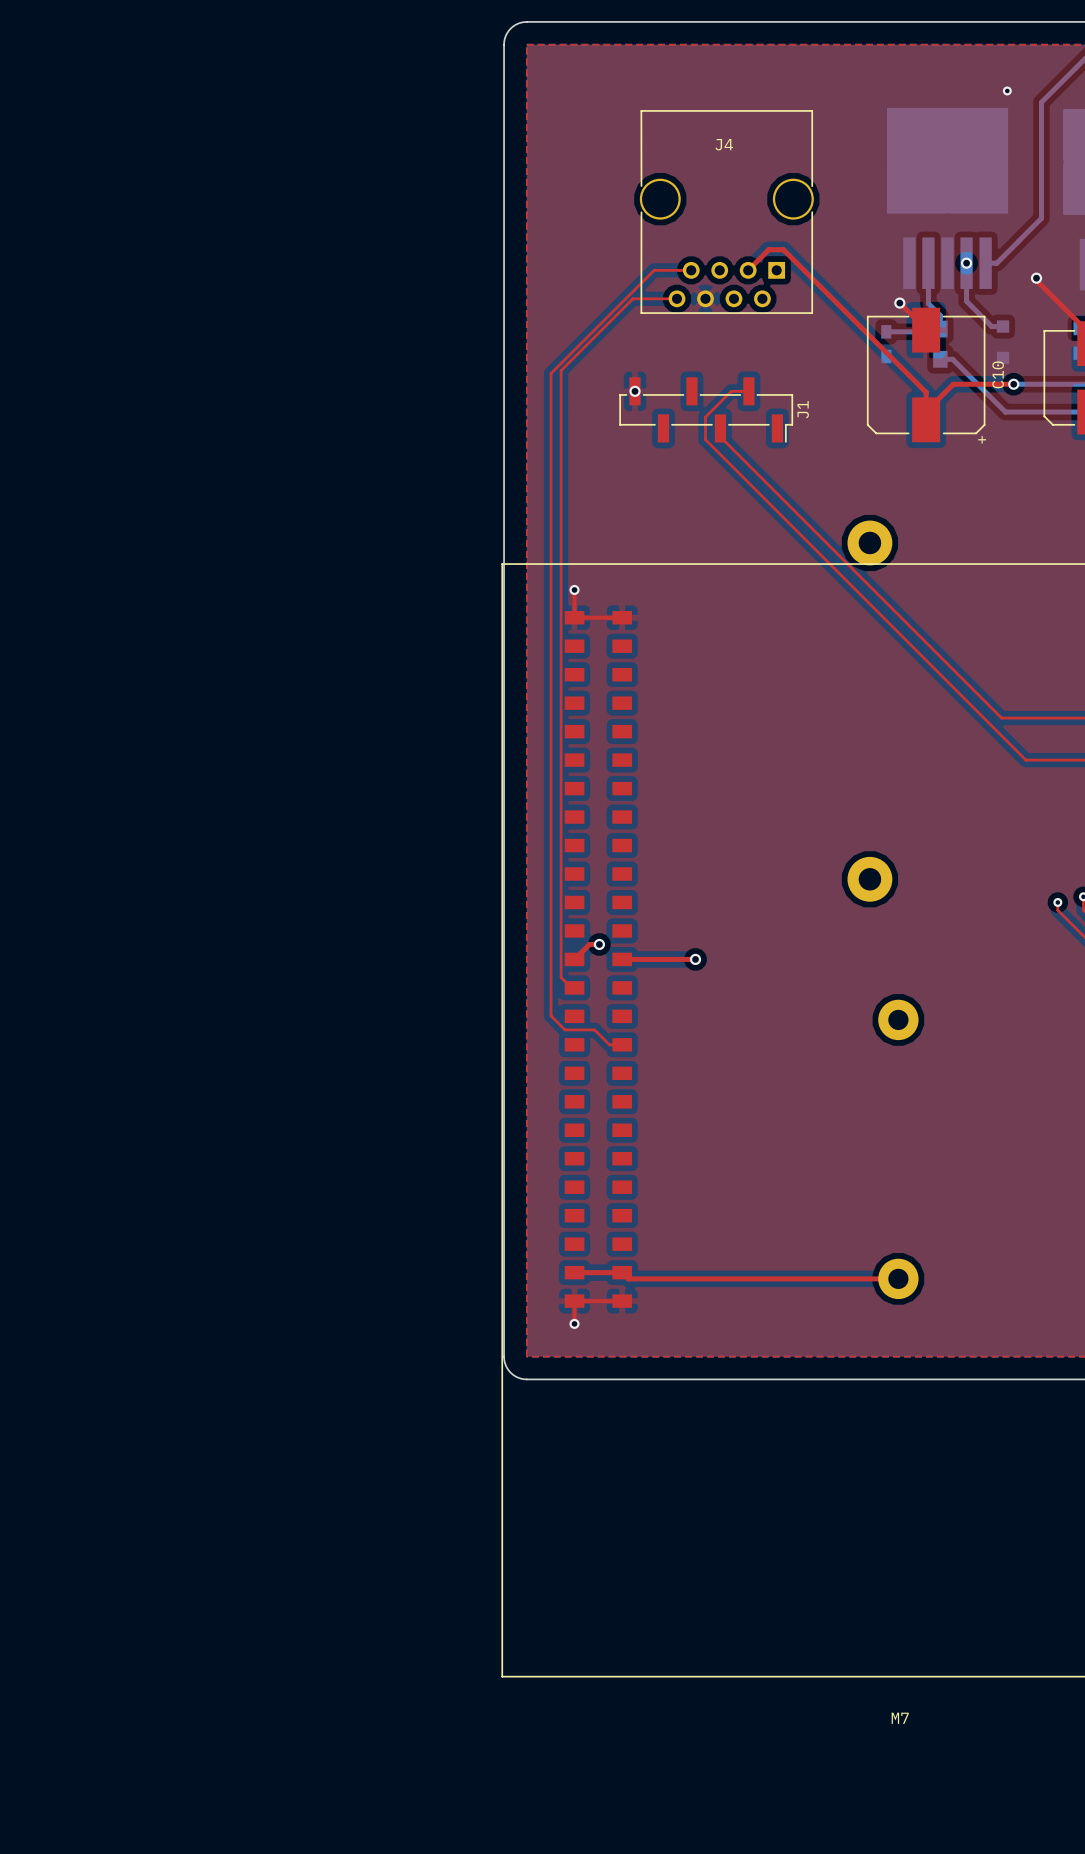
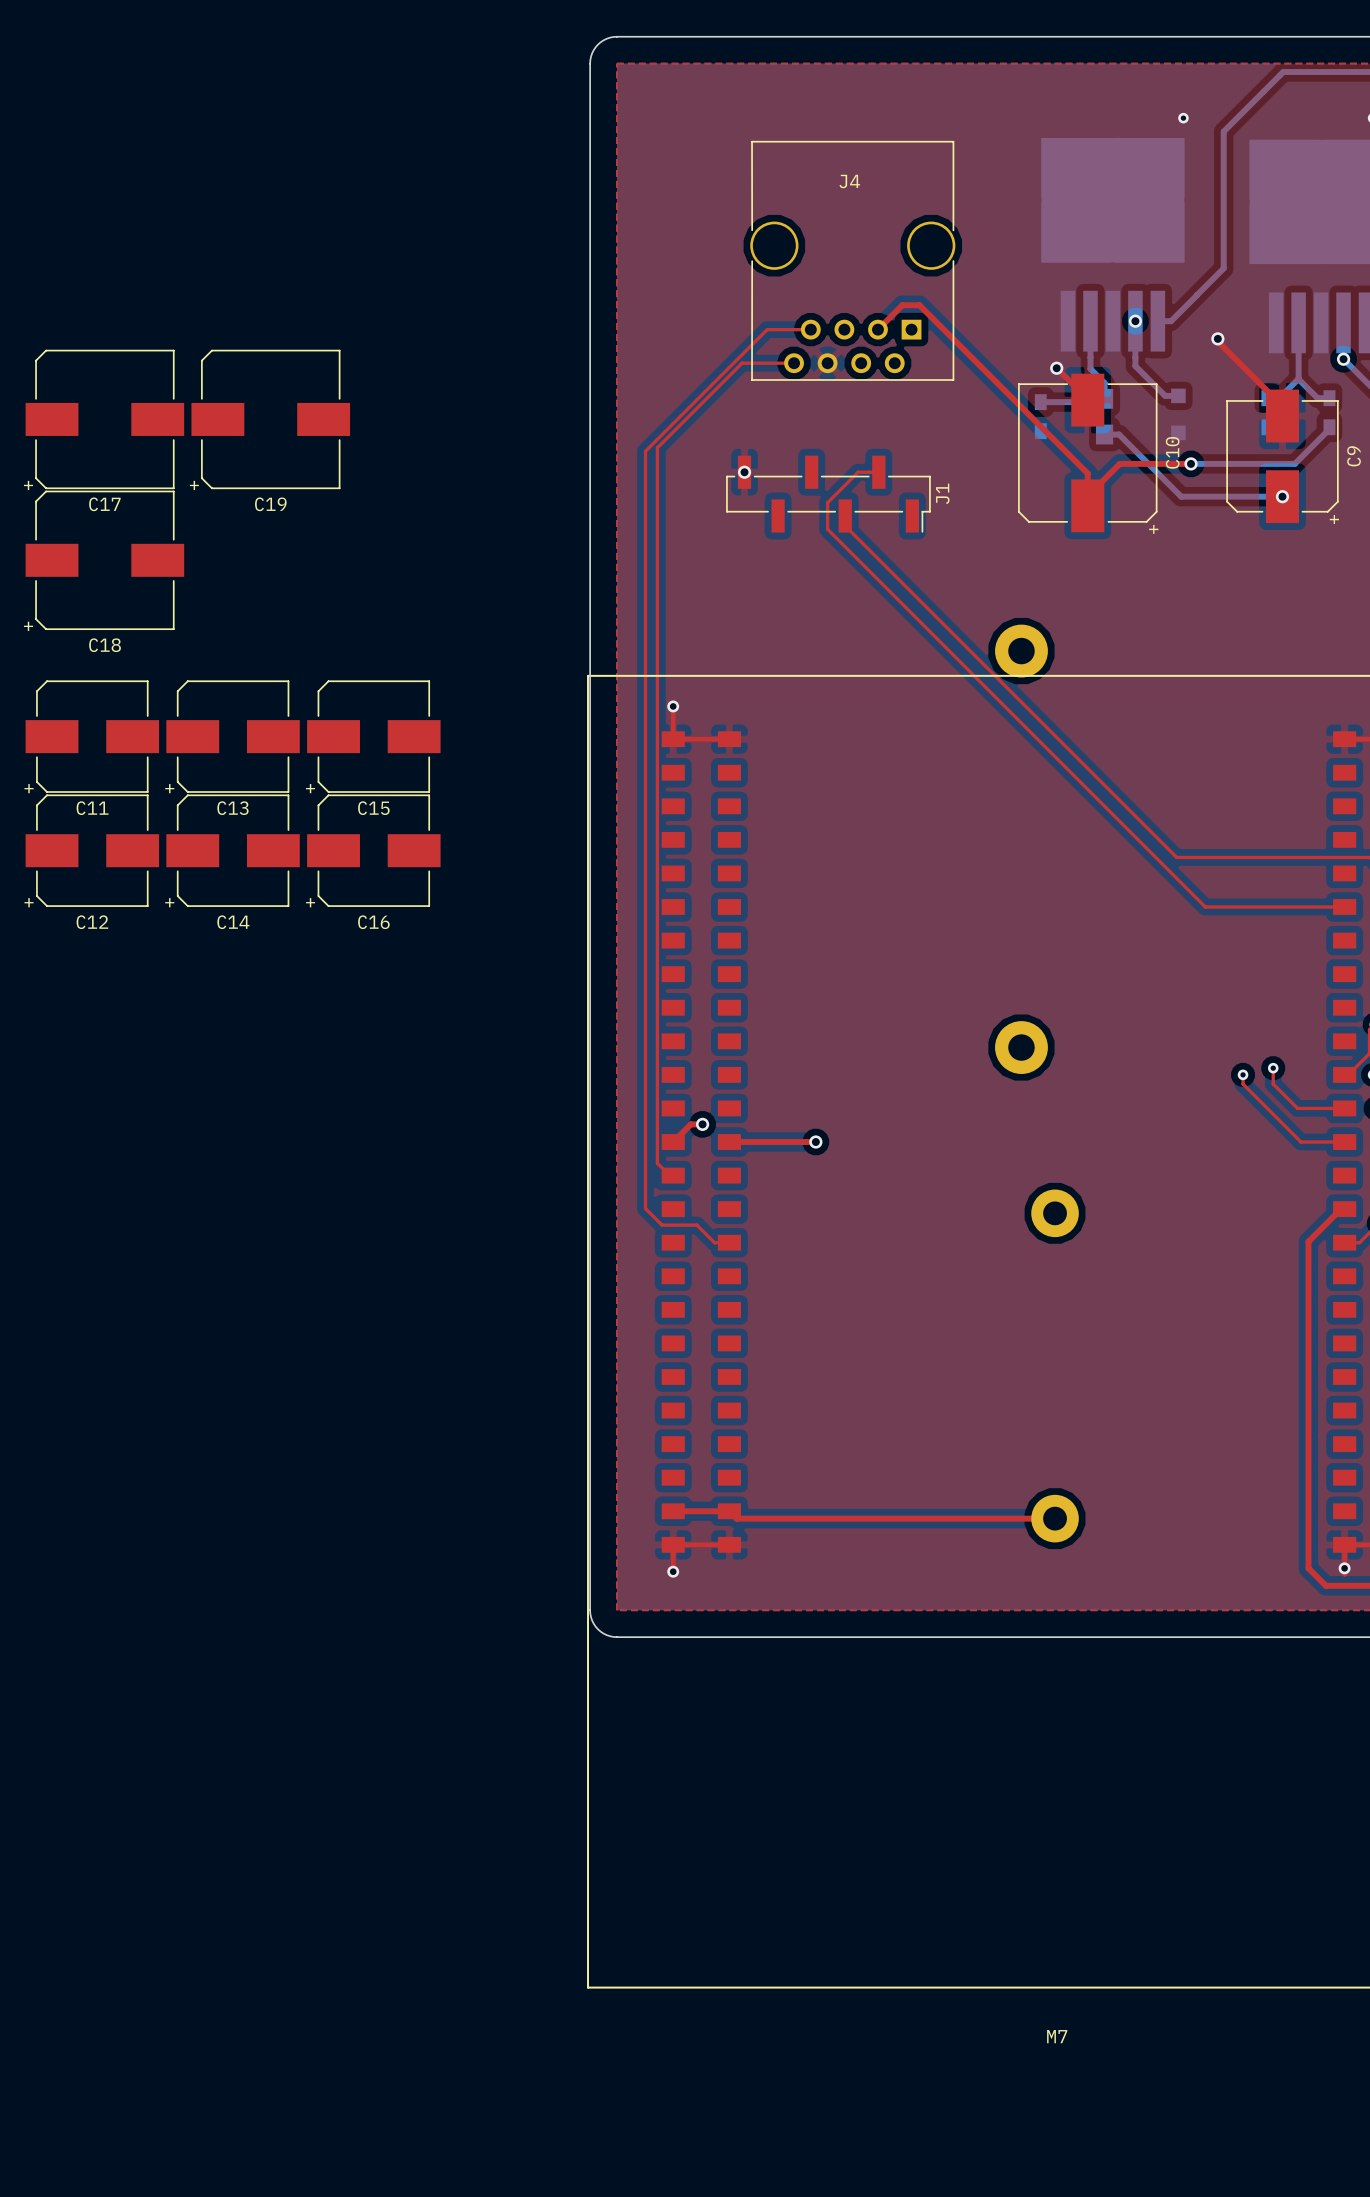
C17: none -> (104, 419)
C19: none -> (270, 419)
C18: none -> (104, 560)
C11: none -> (92, 736)
C13: none -> (233, 736)
C15: none -> (373, 736)
C12: none -> (92, 850)
C14: none -> (233, 850)
C16: none -> (373, 850)

